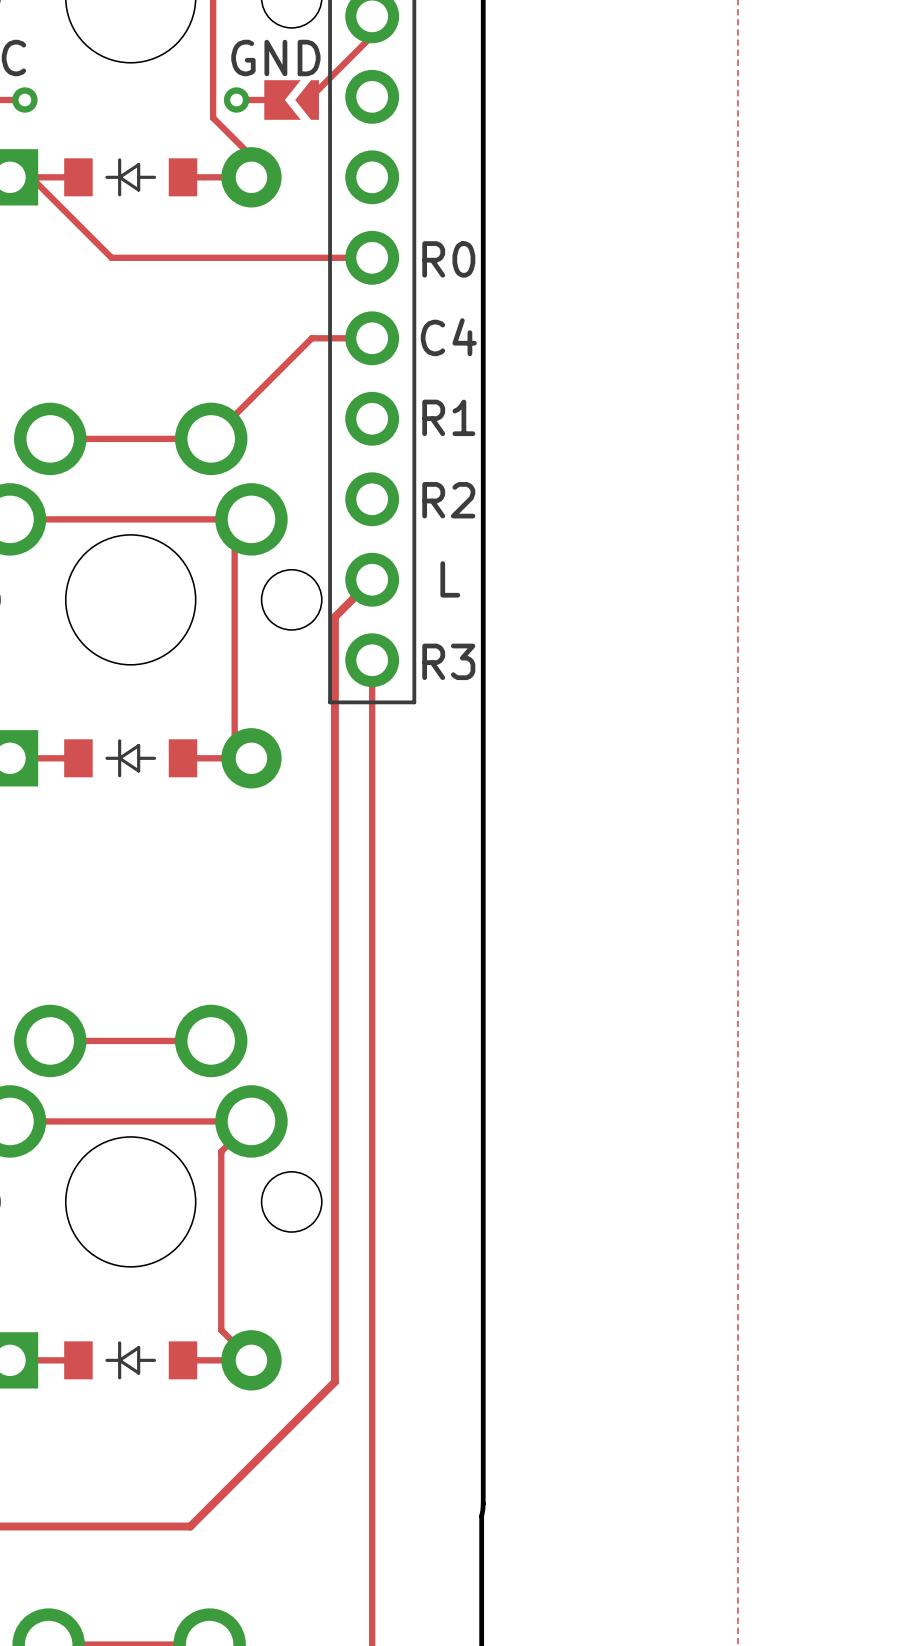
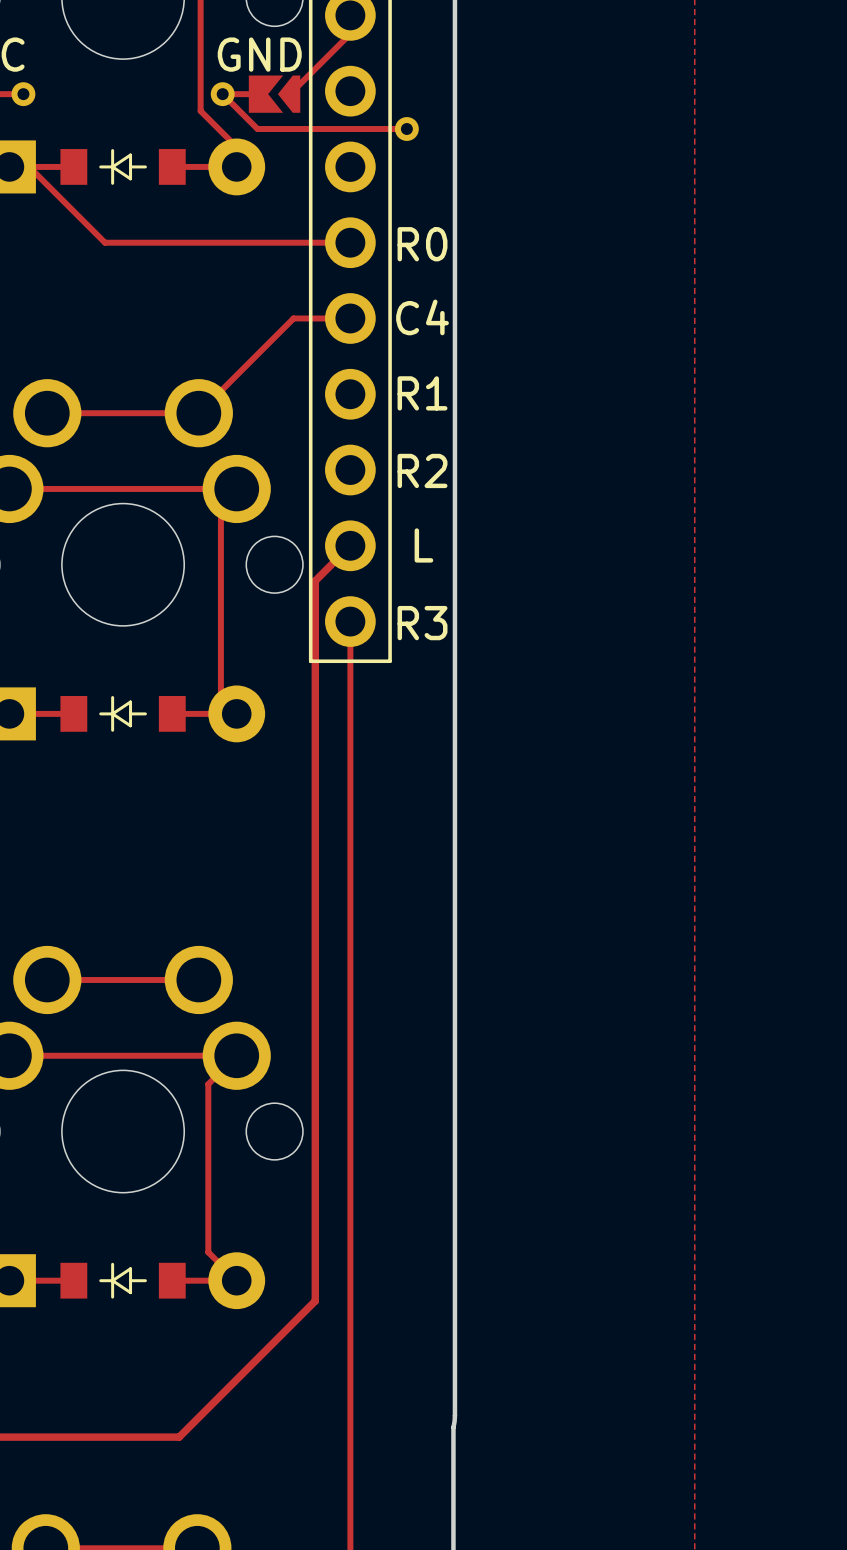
track: none -> (222, 94) (257, 129) (406, 129)
part: none -> (406, 129)

